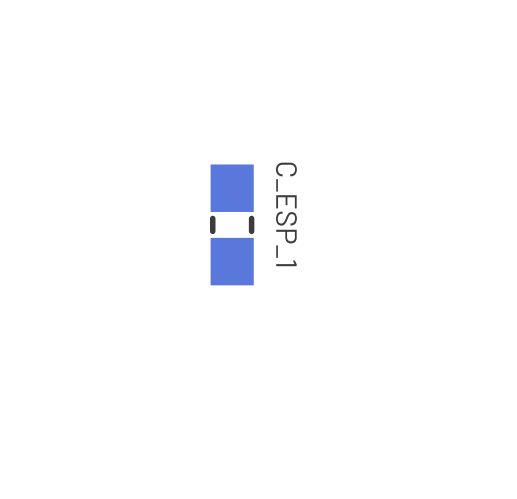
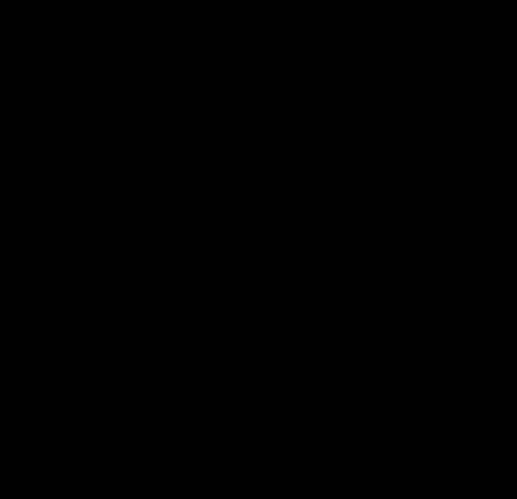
C_ESP_1: (232, 224) -> none

